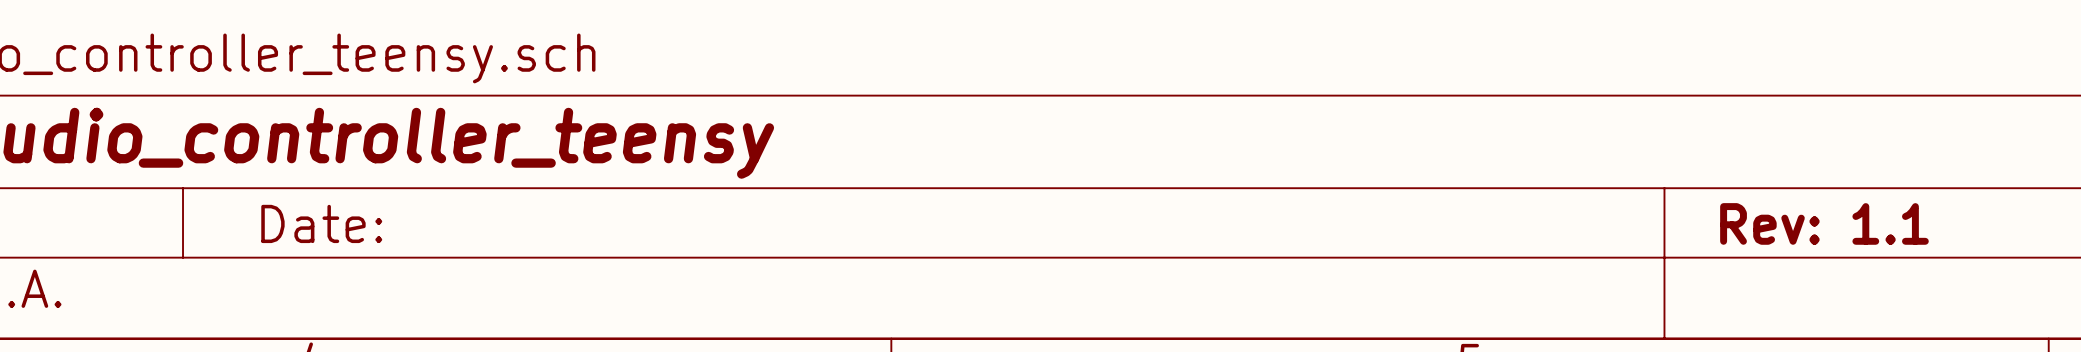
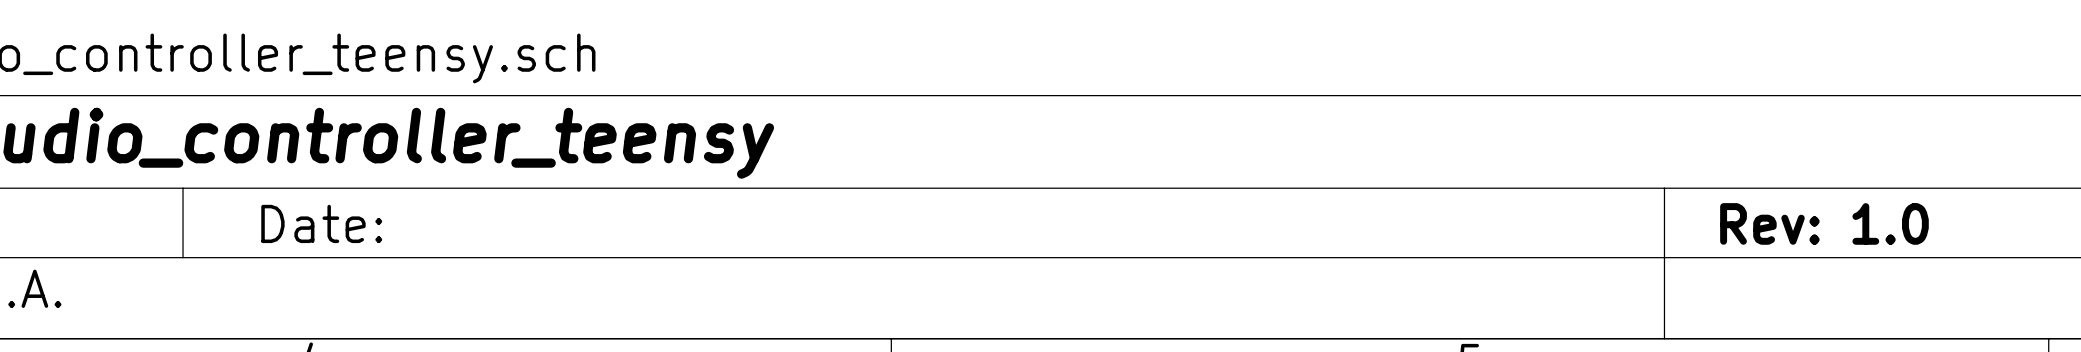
title block: Rev: 1.1 (1824, 223) -> Rev: 1.0 (1824, 223)

